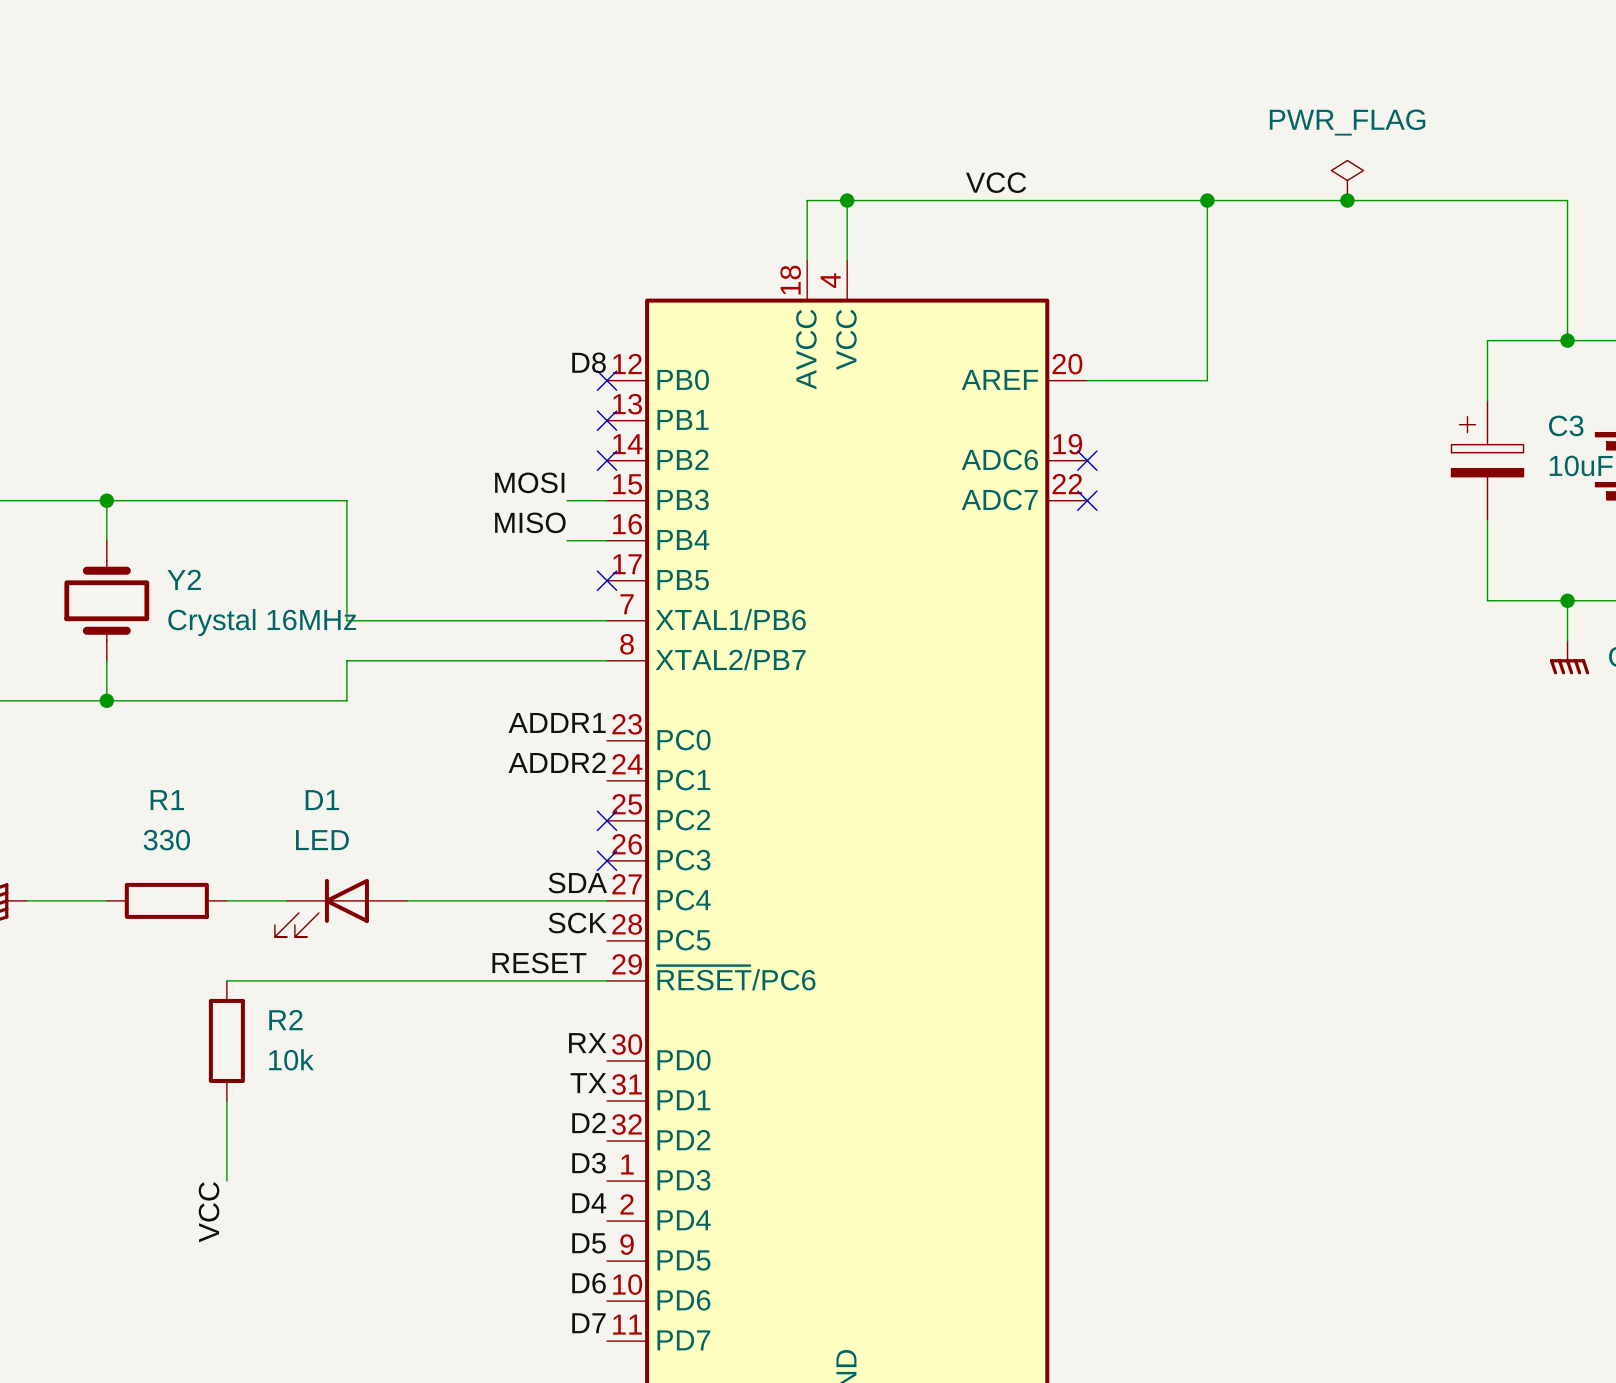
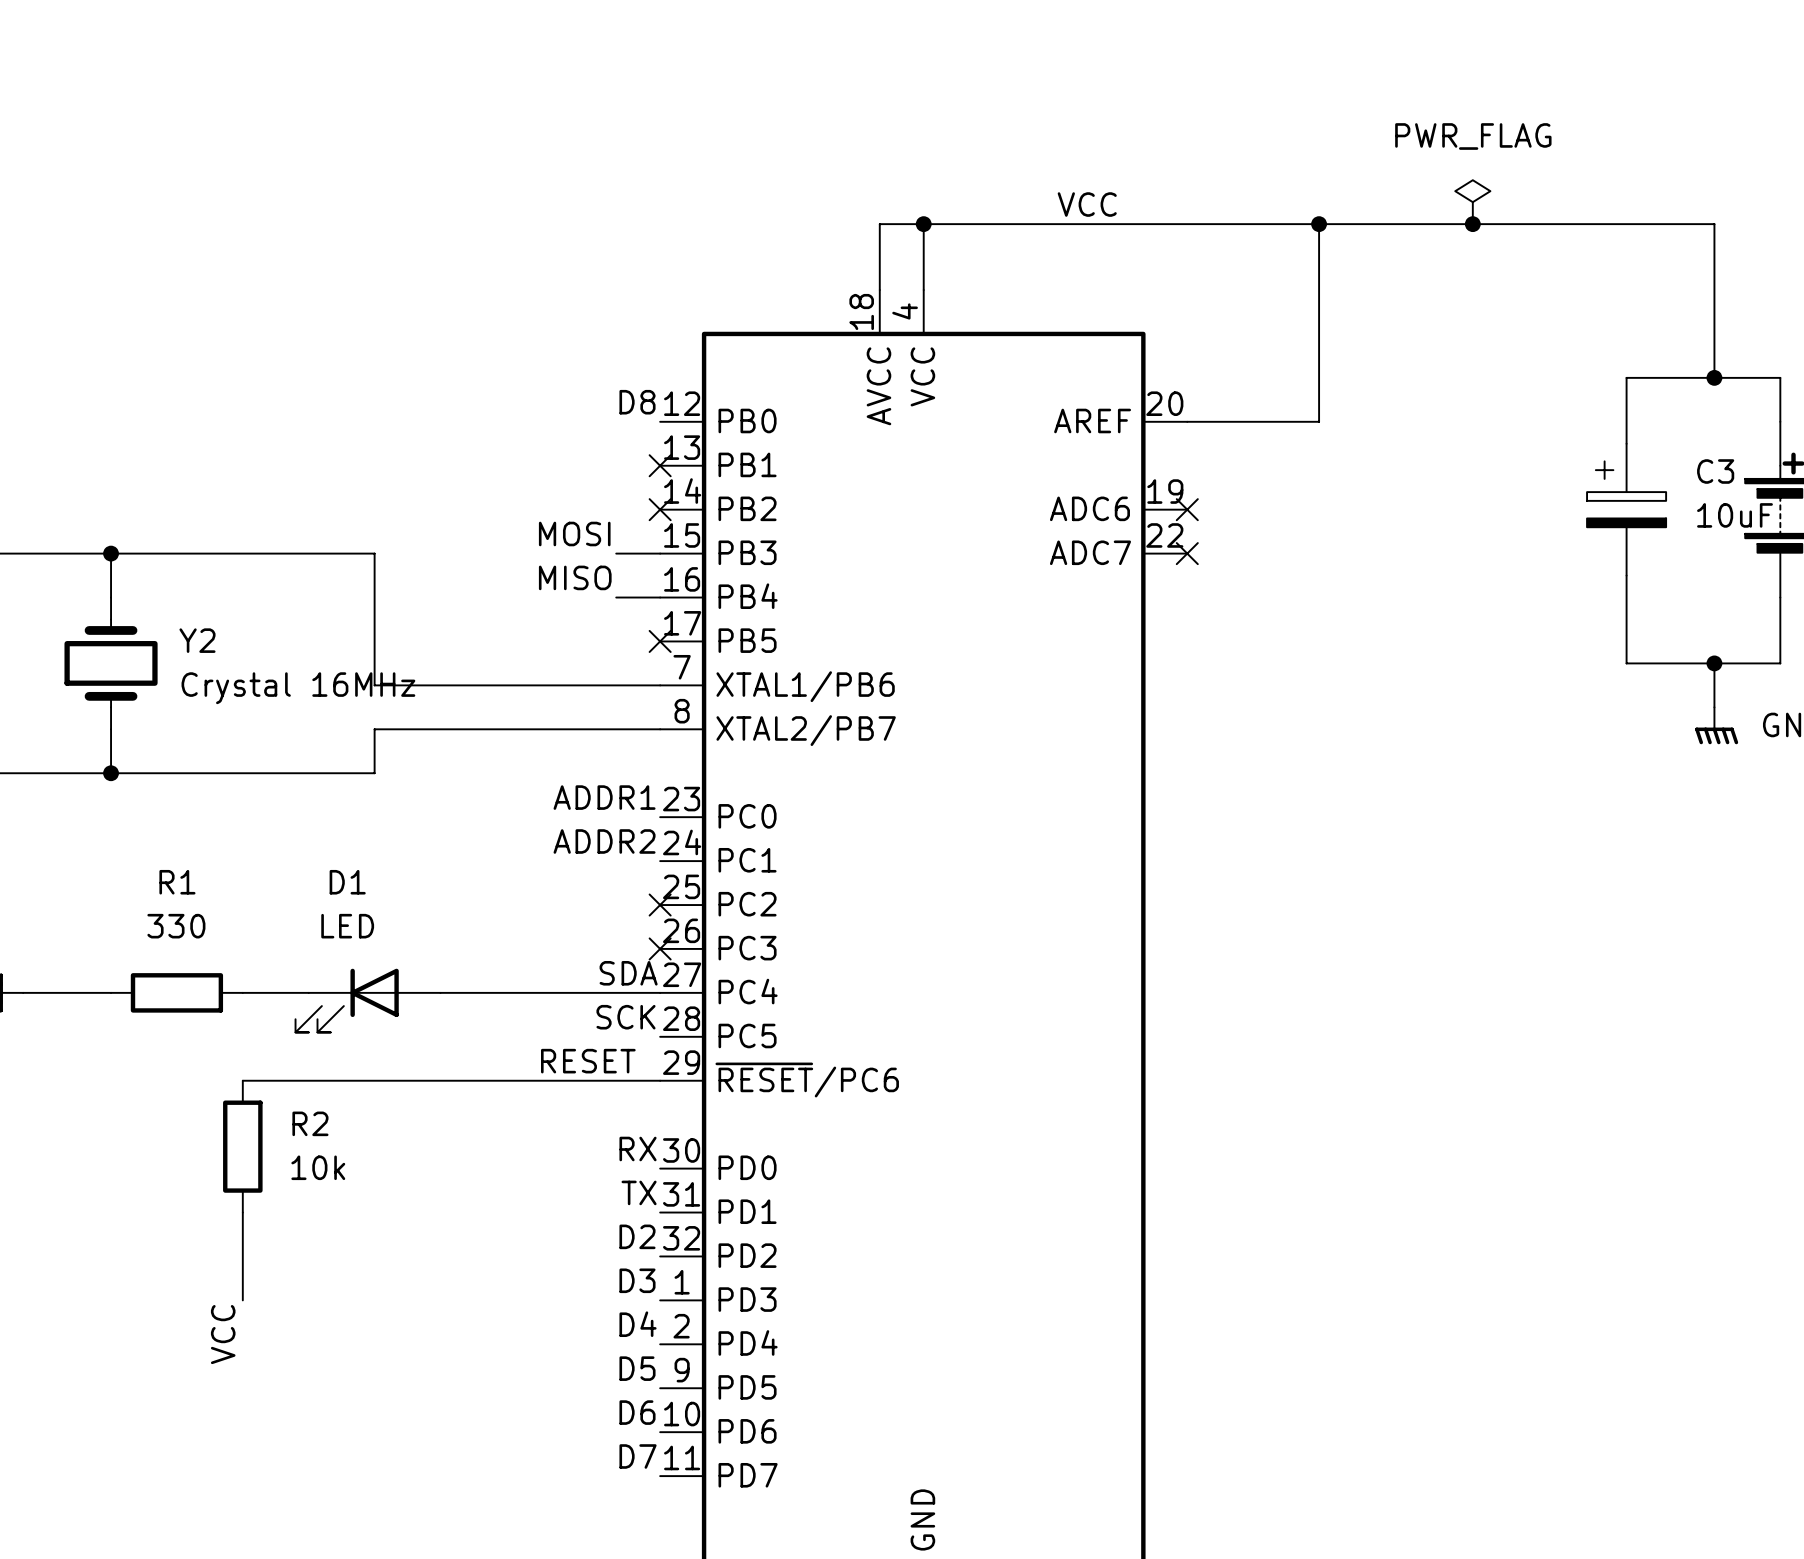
no-connect mark: (607, 380) -> none

